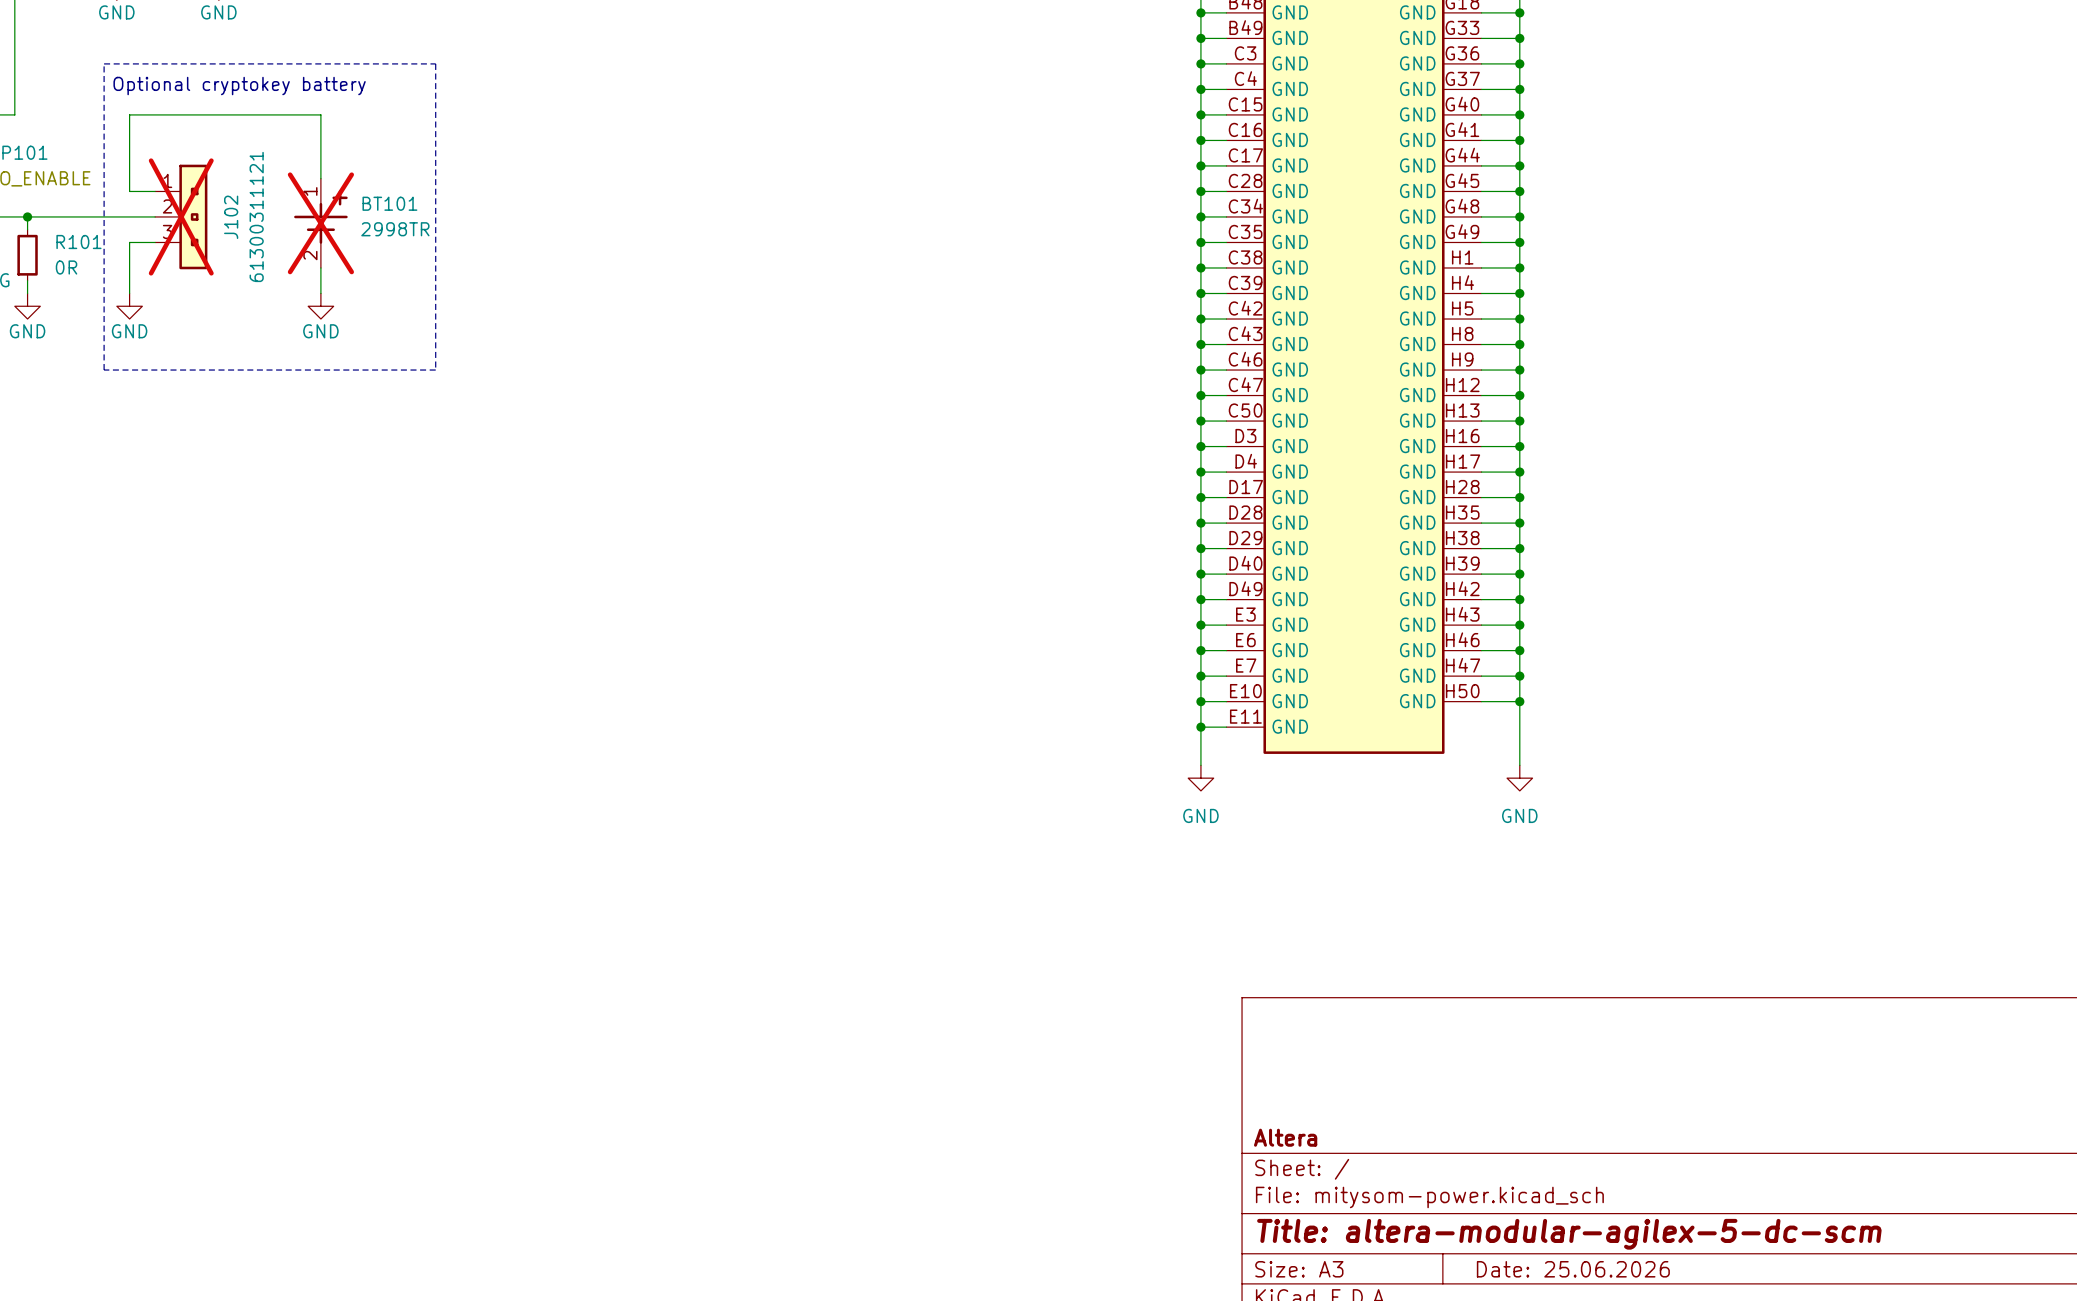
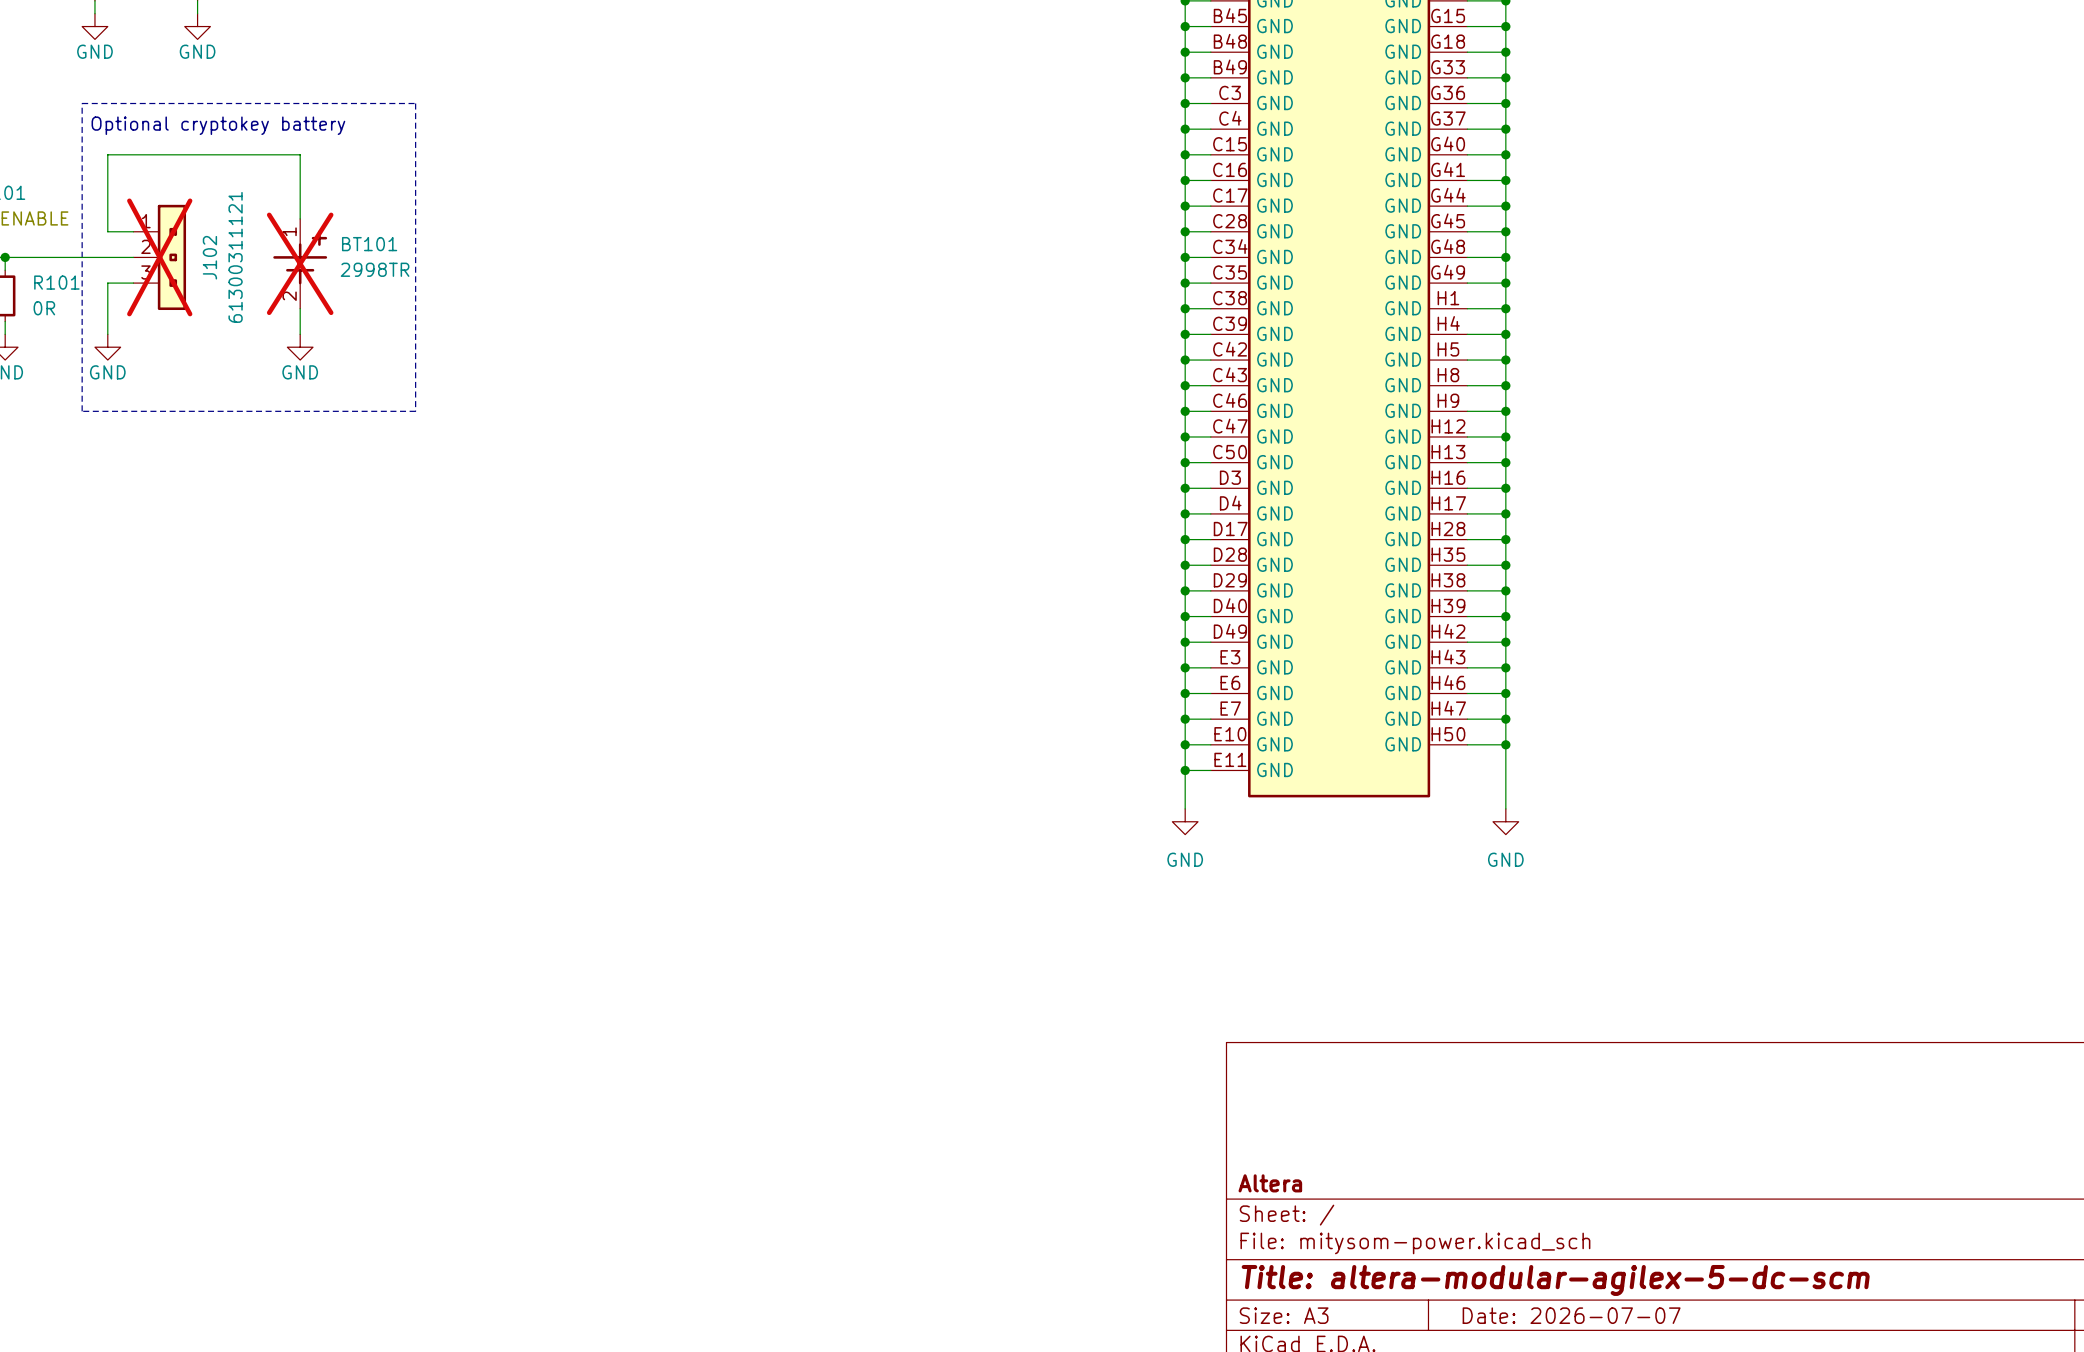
title block: Date: 25.06.2026 (1573, 1269) -> Date: 2026-07-07 (1571, 1315)

